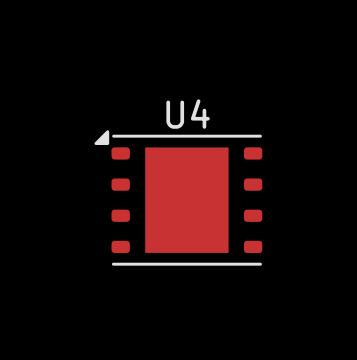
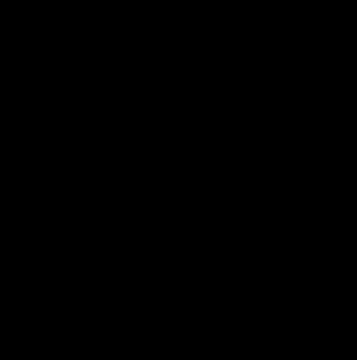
U4: (178, 197) -> none

